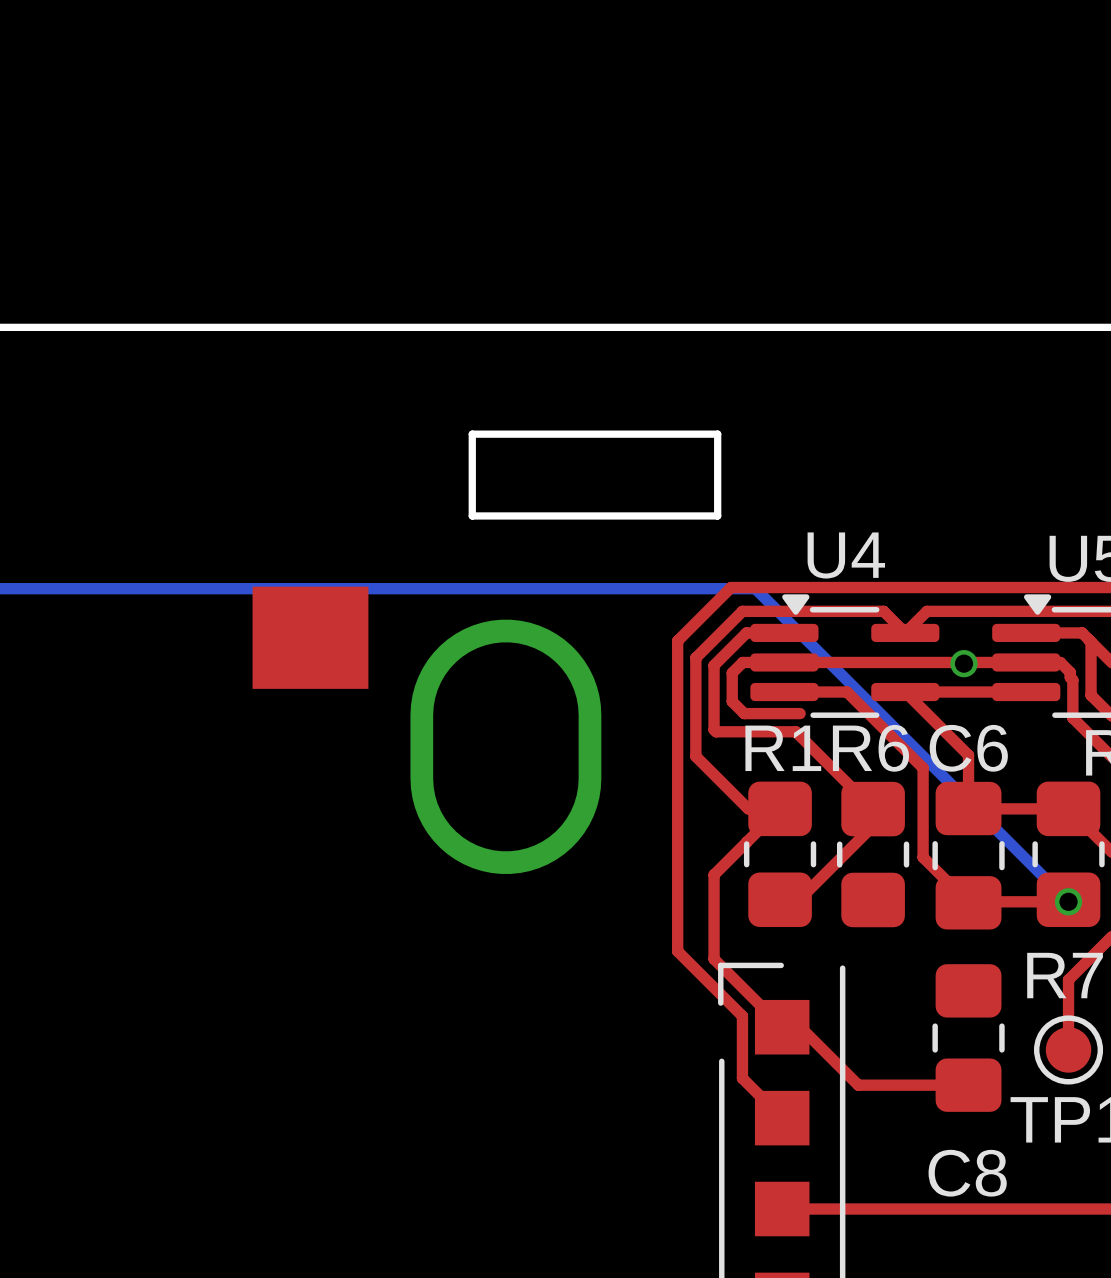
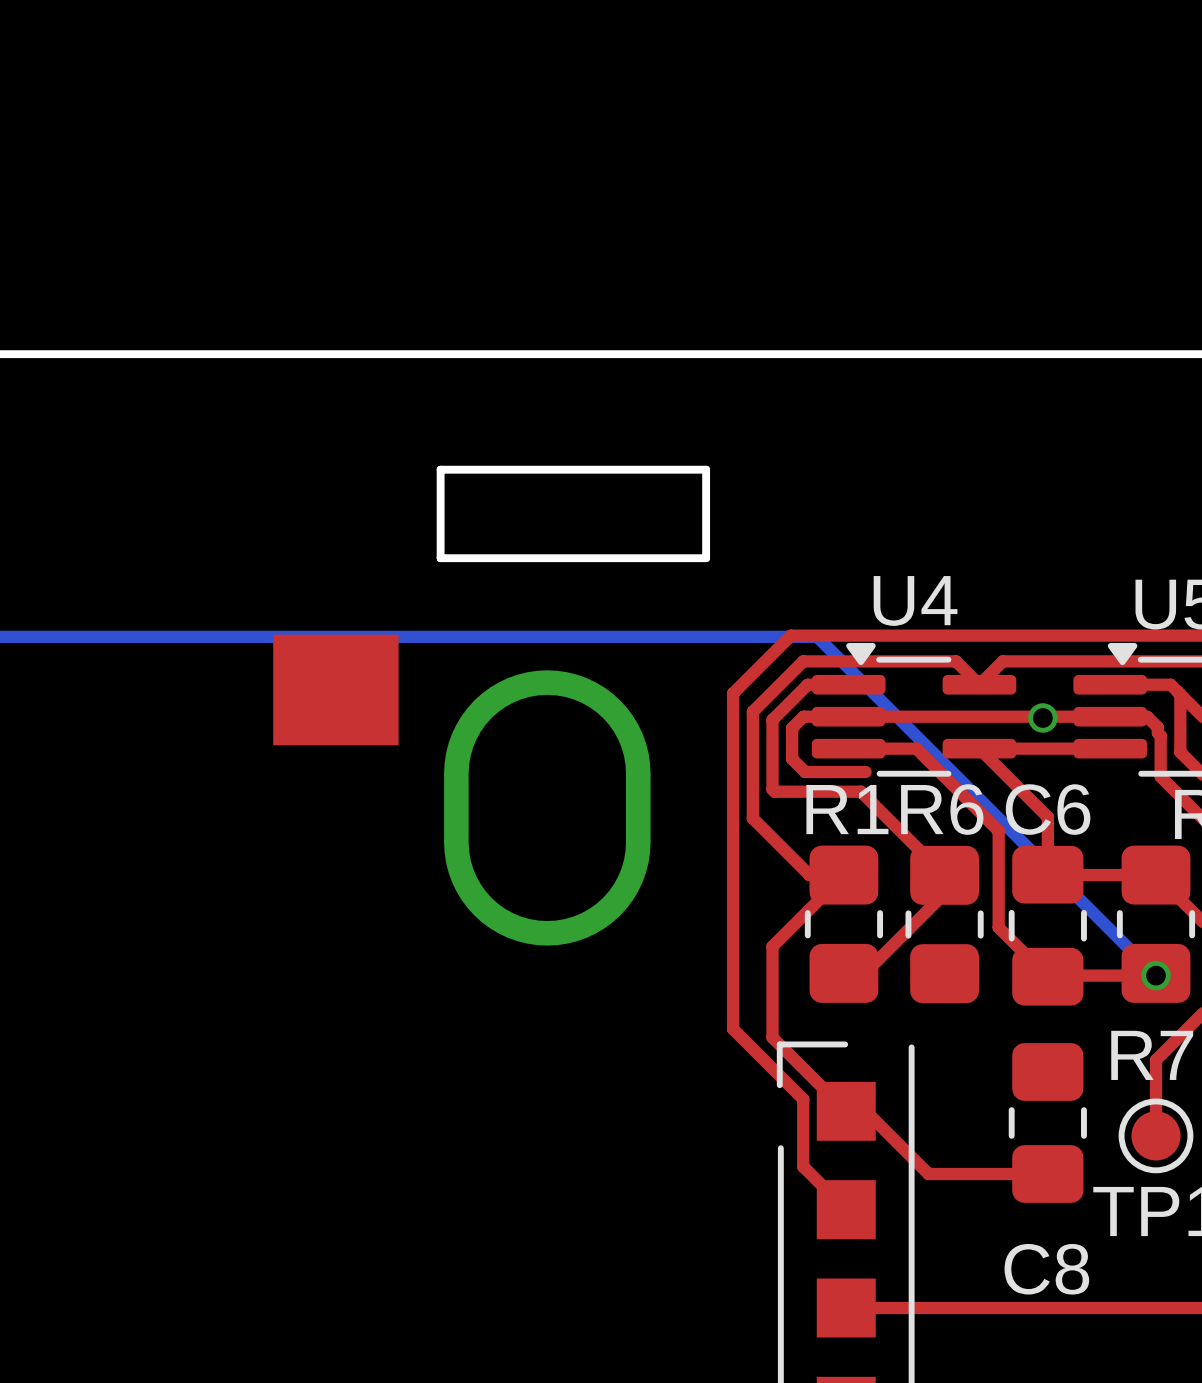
board edge: (472, 434) (472, 515) -> (510, 469) (440, 469) (440, 558) (510, 558)
board edge: (652, 434) (717, 434) (717, 515) (652, 515) -> (706, 469) (706, 558)

